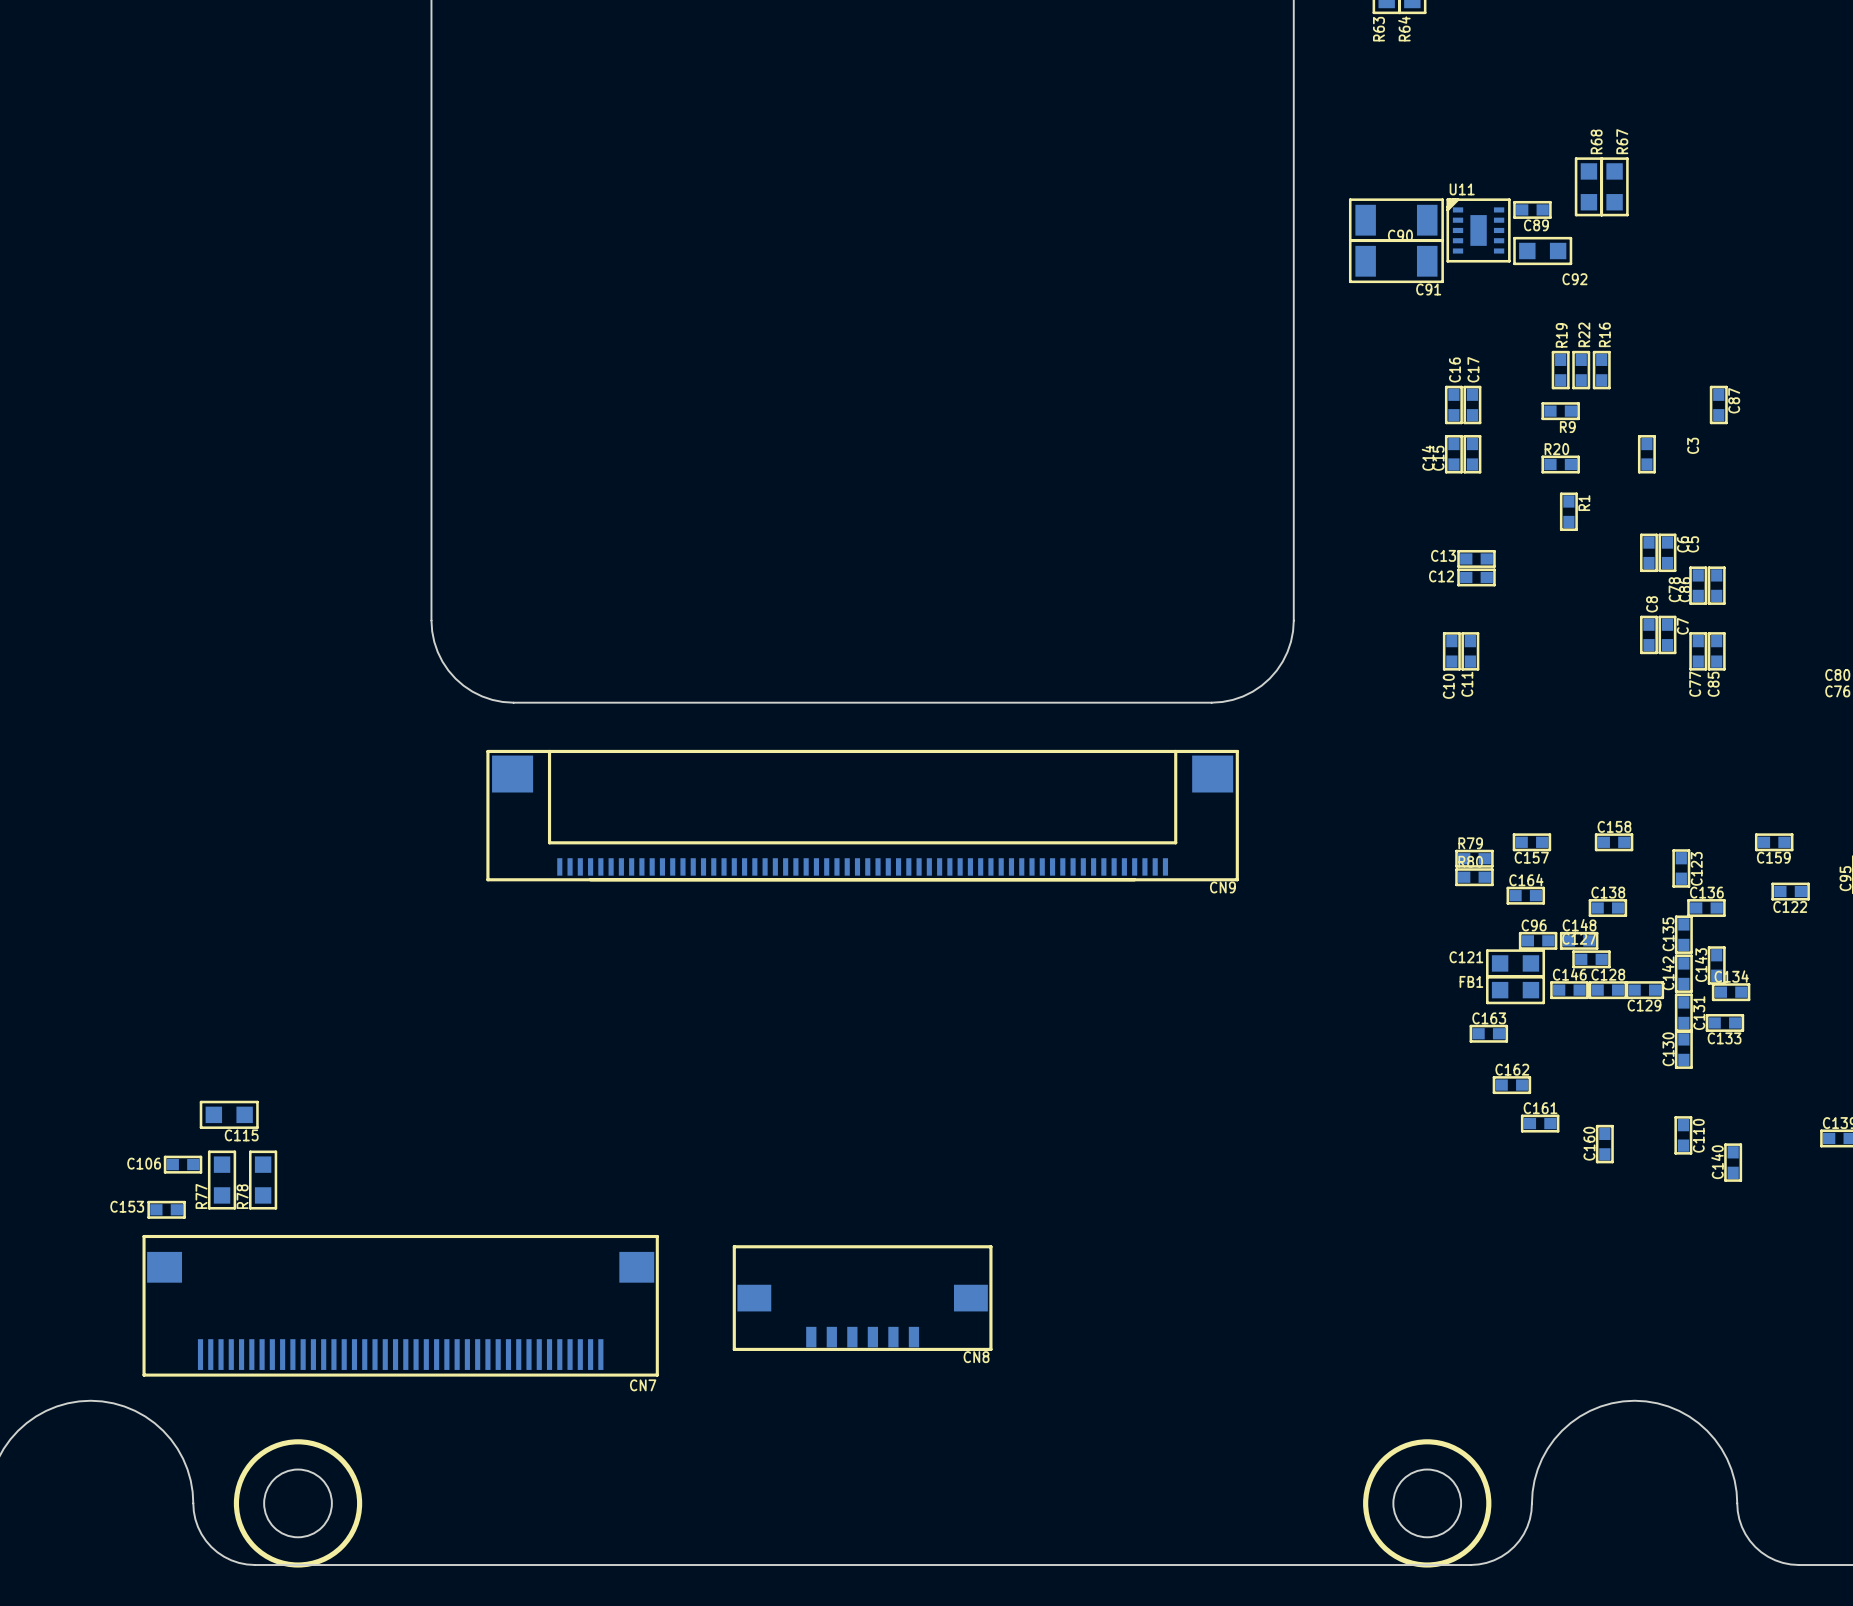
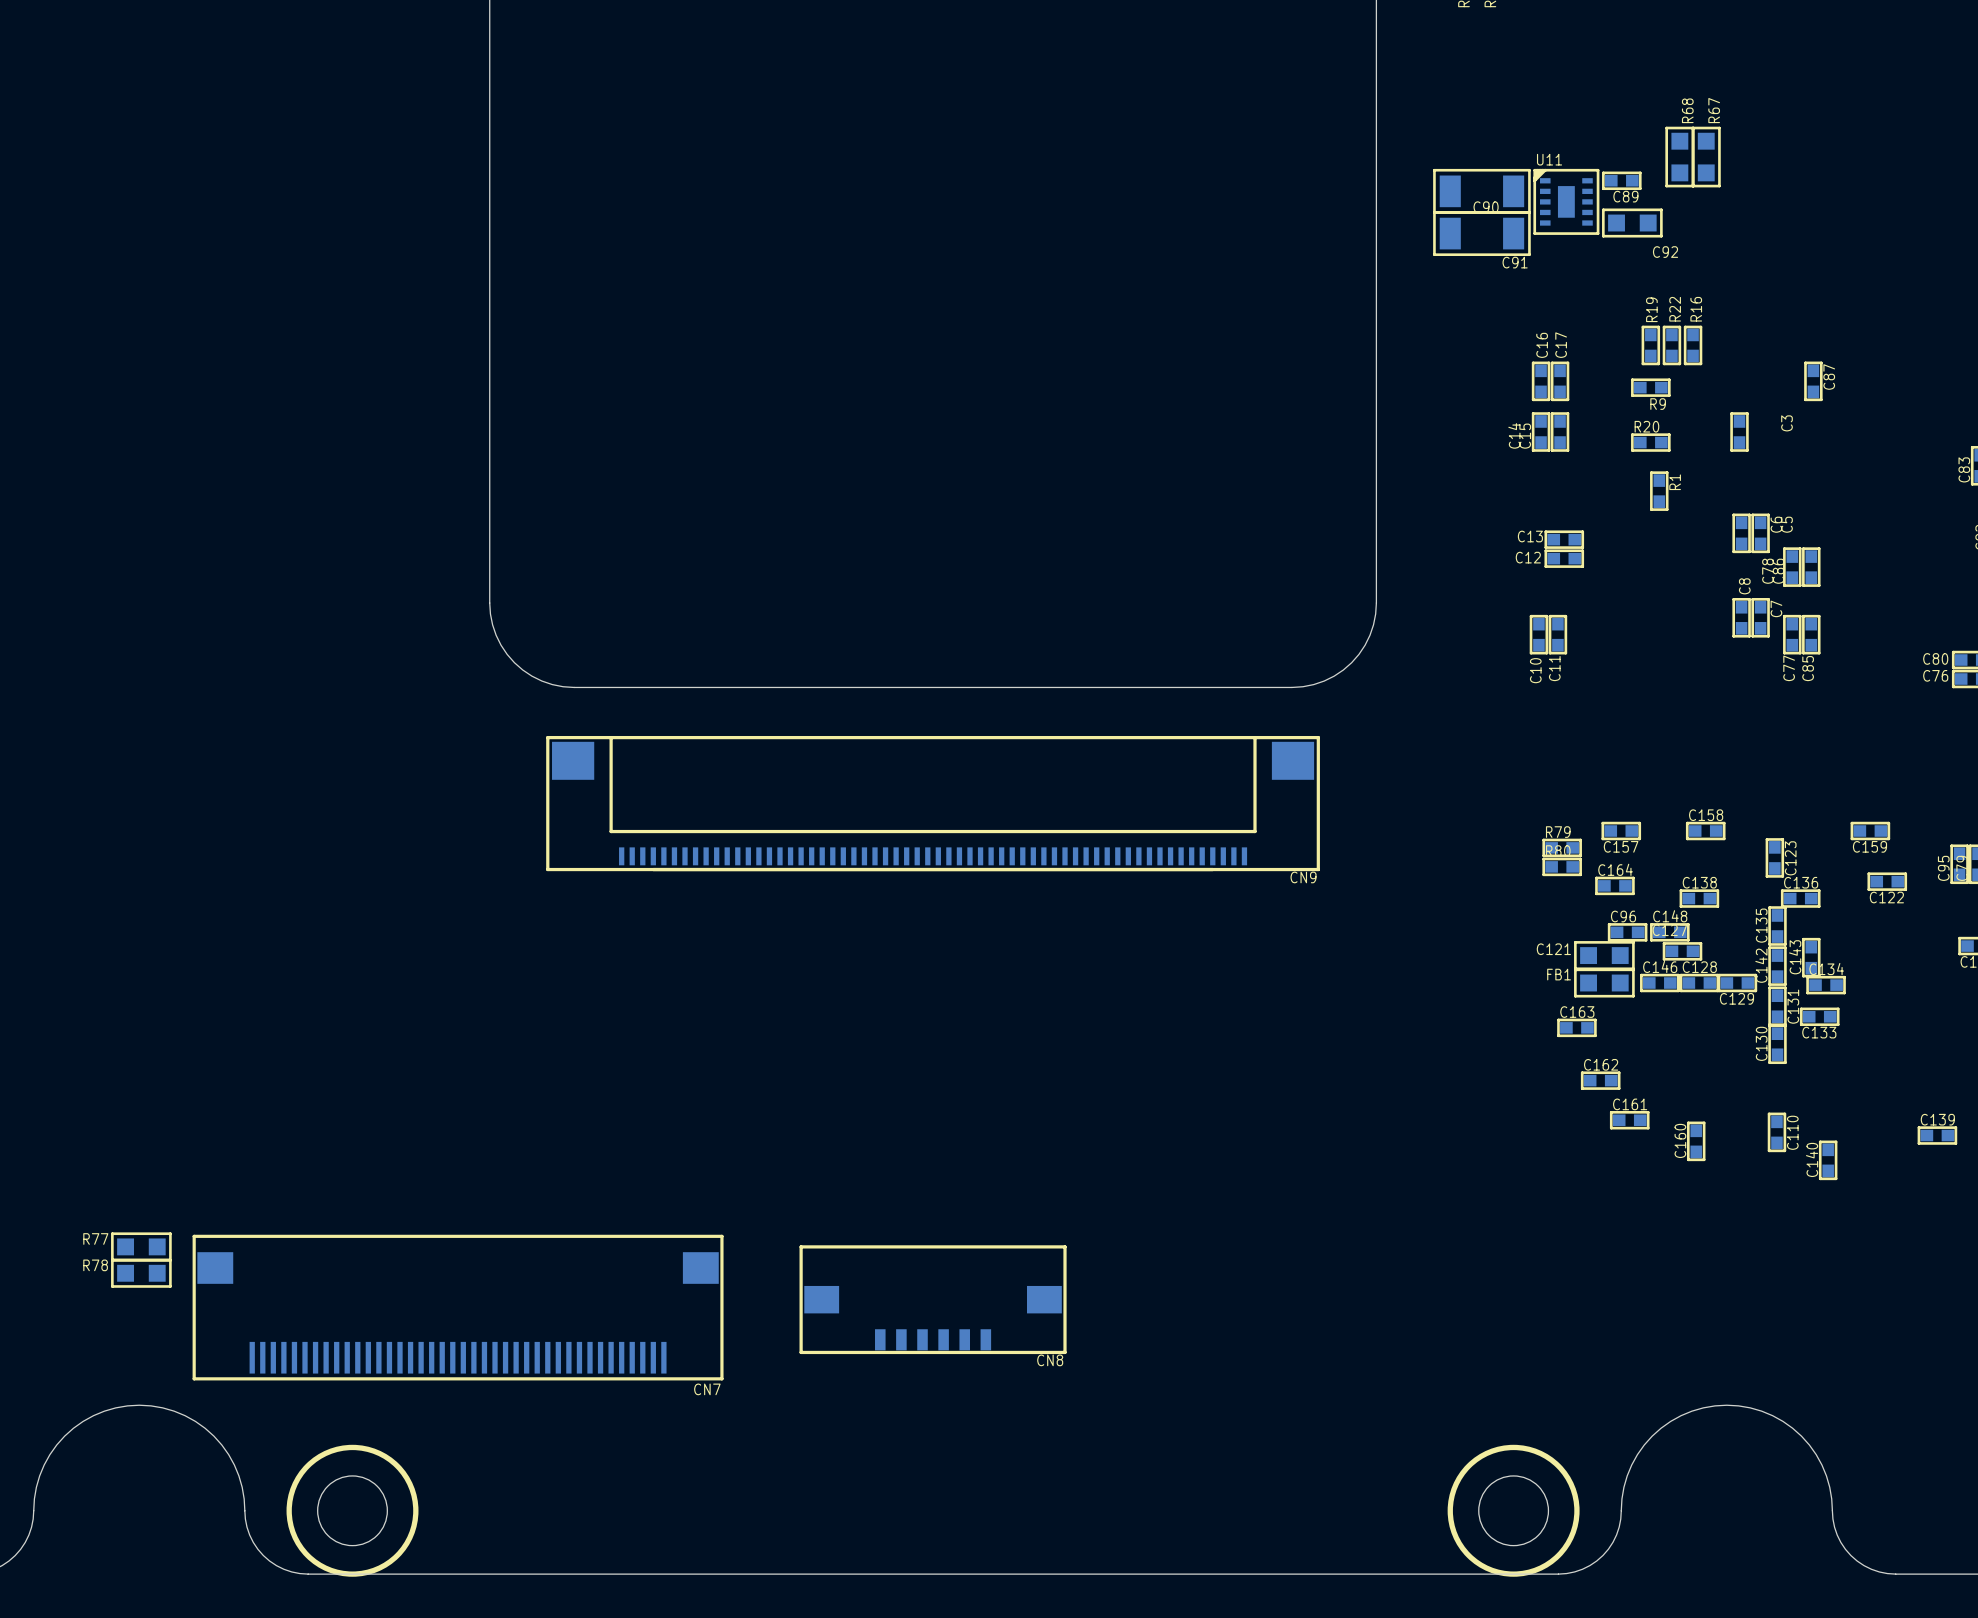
C115: (229, 1114) -> none
C106: (183, 1164) -> none
R77 rotation: 0° (222, 1180) -> 90° clockwise (141, 1246)
R77 position: (222, 1180) -> (141, 1246)
R78 rotation: 0° (263, 1180) -> 90° clockwise (141, 1273)
R78 position: (263, 1180) -> (141, 1273)
C153: (166, 1209) -> none

